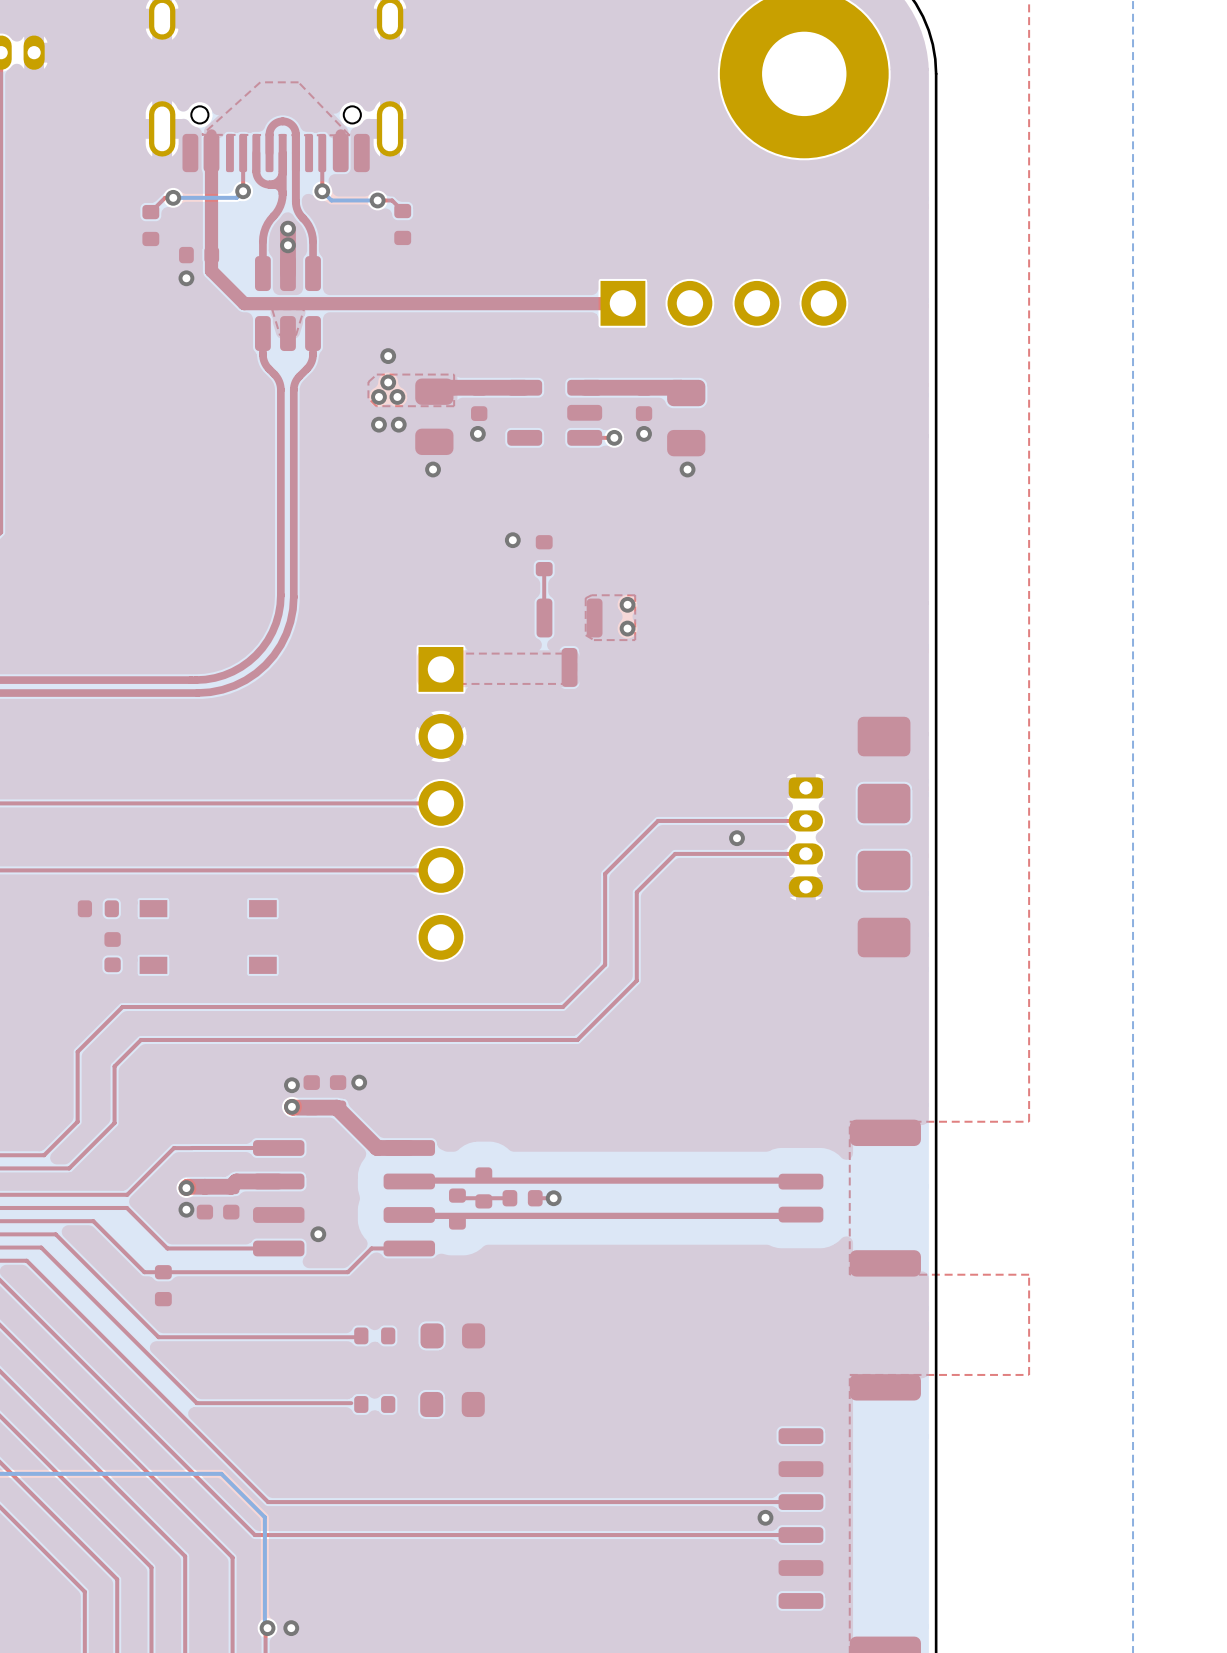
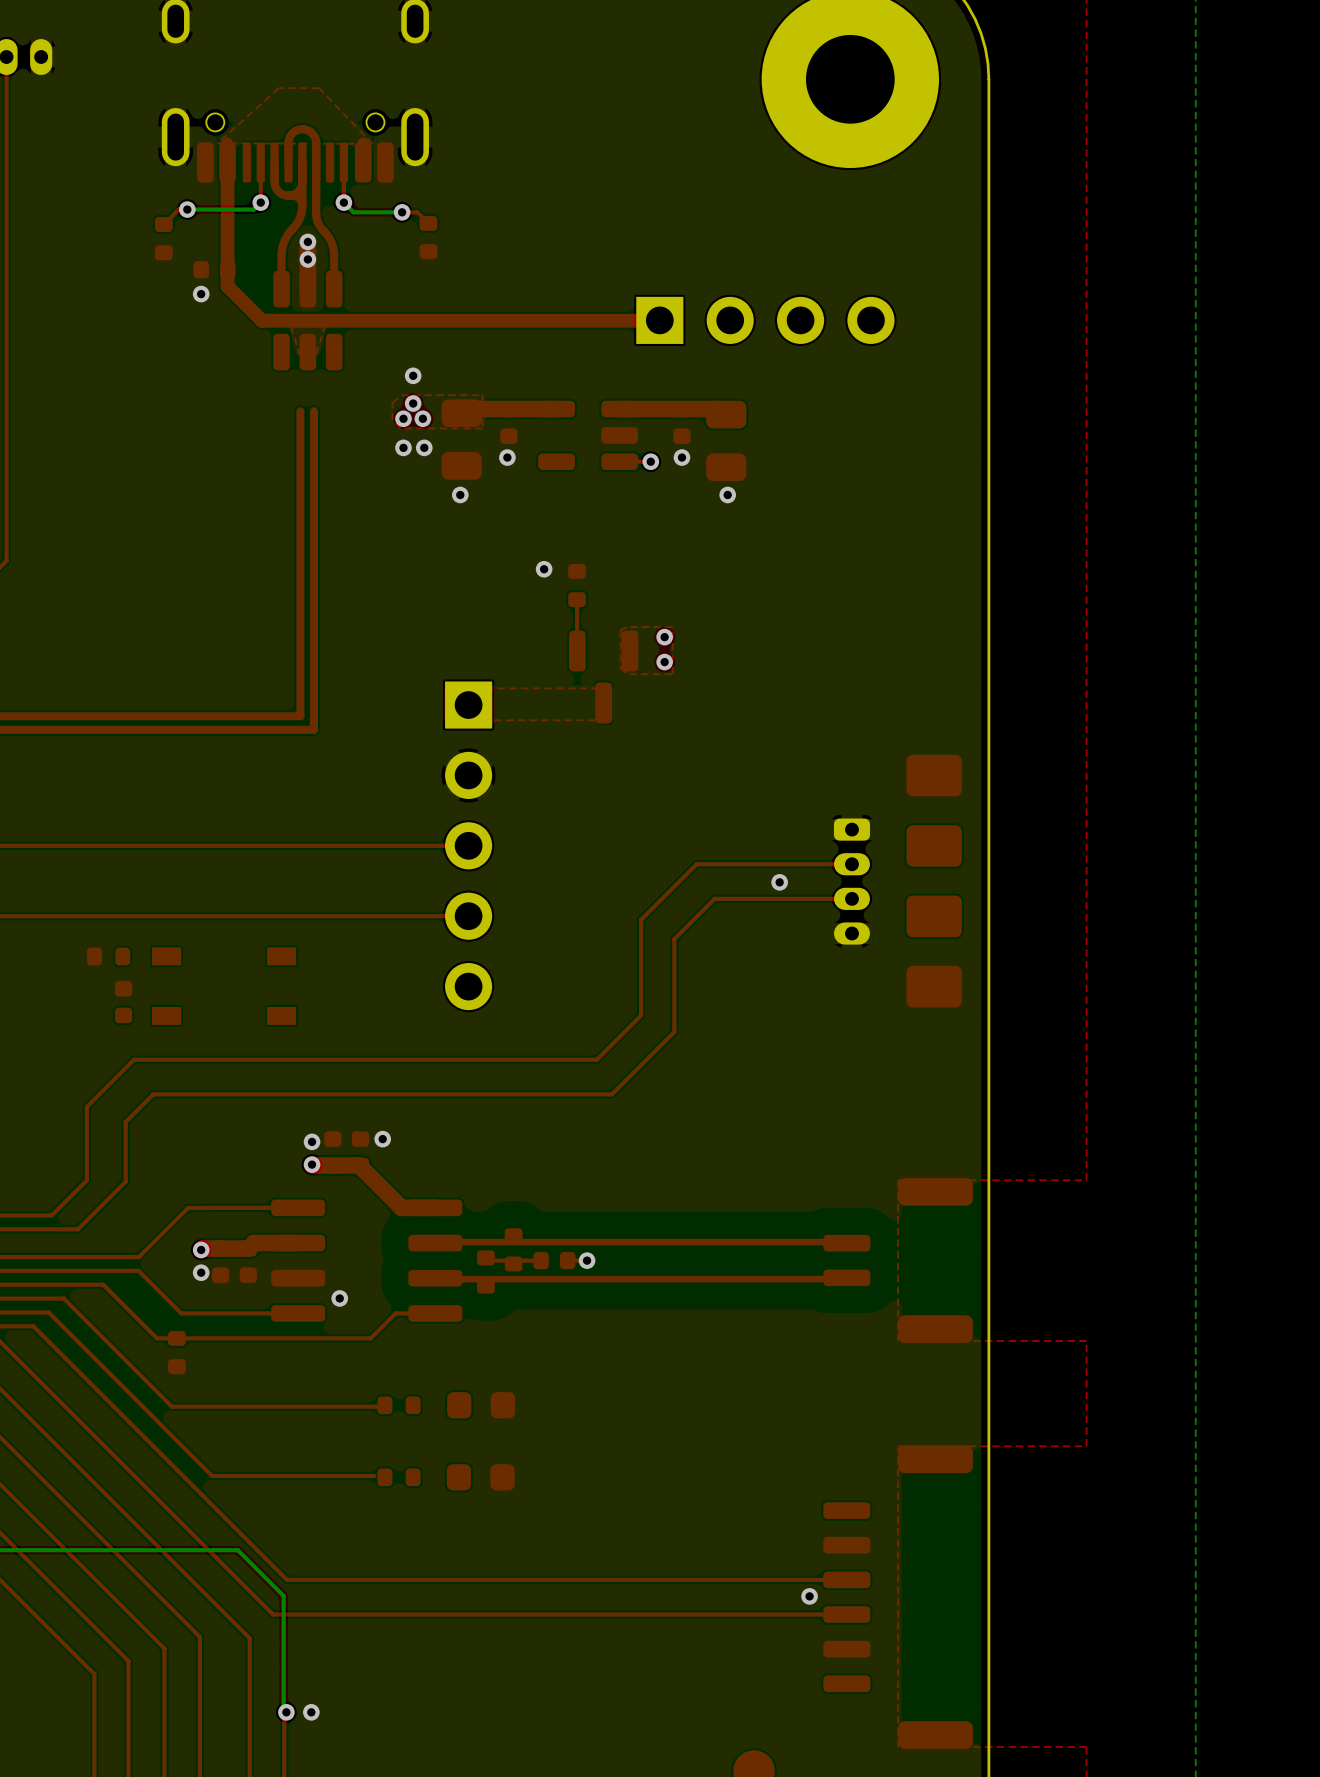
top track: (262, 333) (263, 360) (278, 379) (280, 389) -> none
top track: (313, 333) (312, 360) (296, 379) (293, 389) -> none
top track: (280, 595) (276, 623) (267, 640) (256, 655) (241, 667) (224, 675) (205, 679) (190, 680) -> (300, 627) (300, 716) (205, 716)
top track: (293, 597) (290, 621) (286, 633) (273, 655) (265, 664) (256, 673) (234, 685) (210, 692) (197, 693) -> (313, 628) (313, 729) (213, 729)

